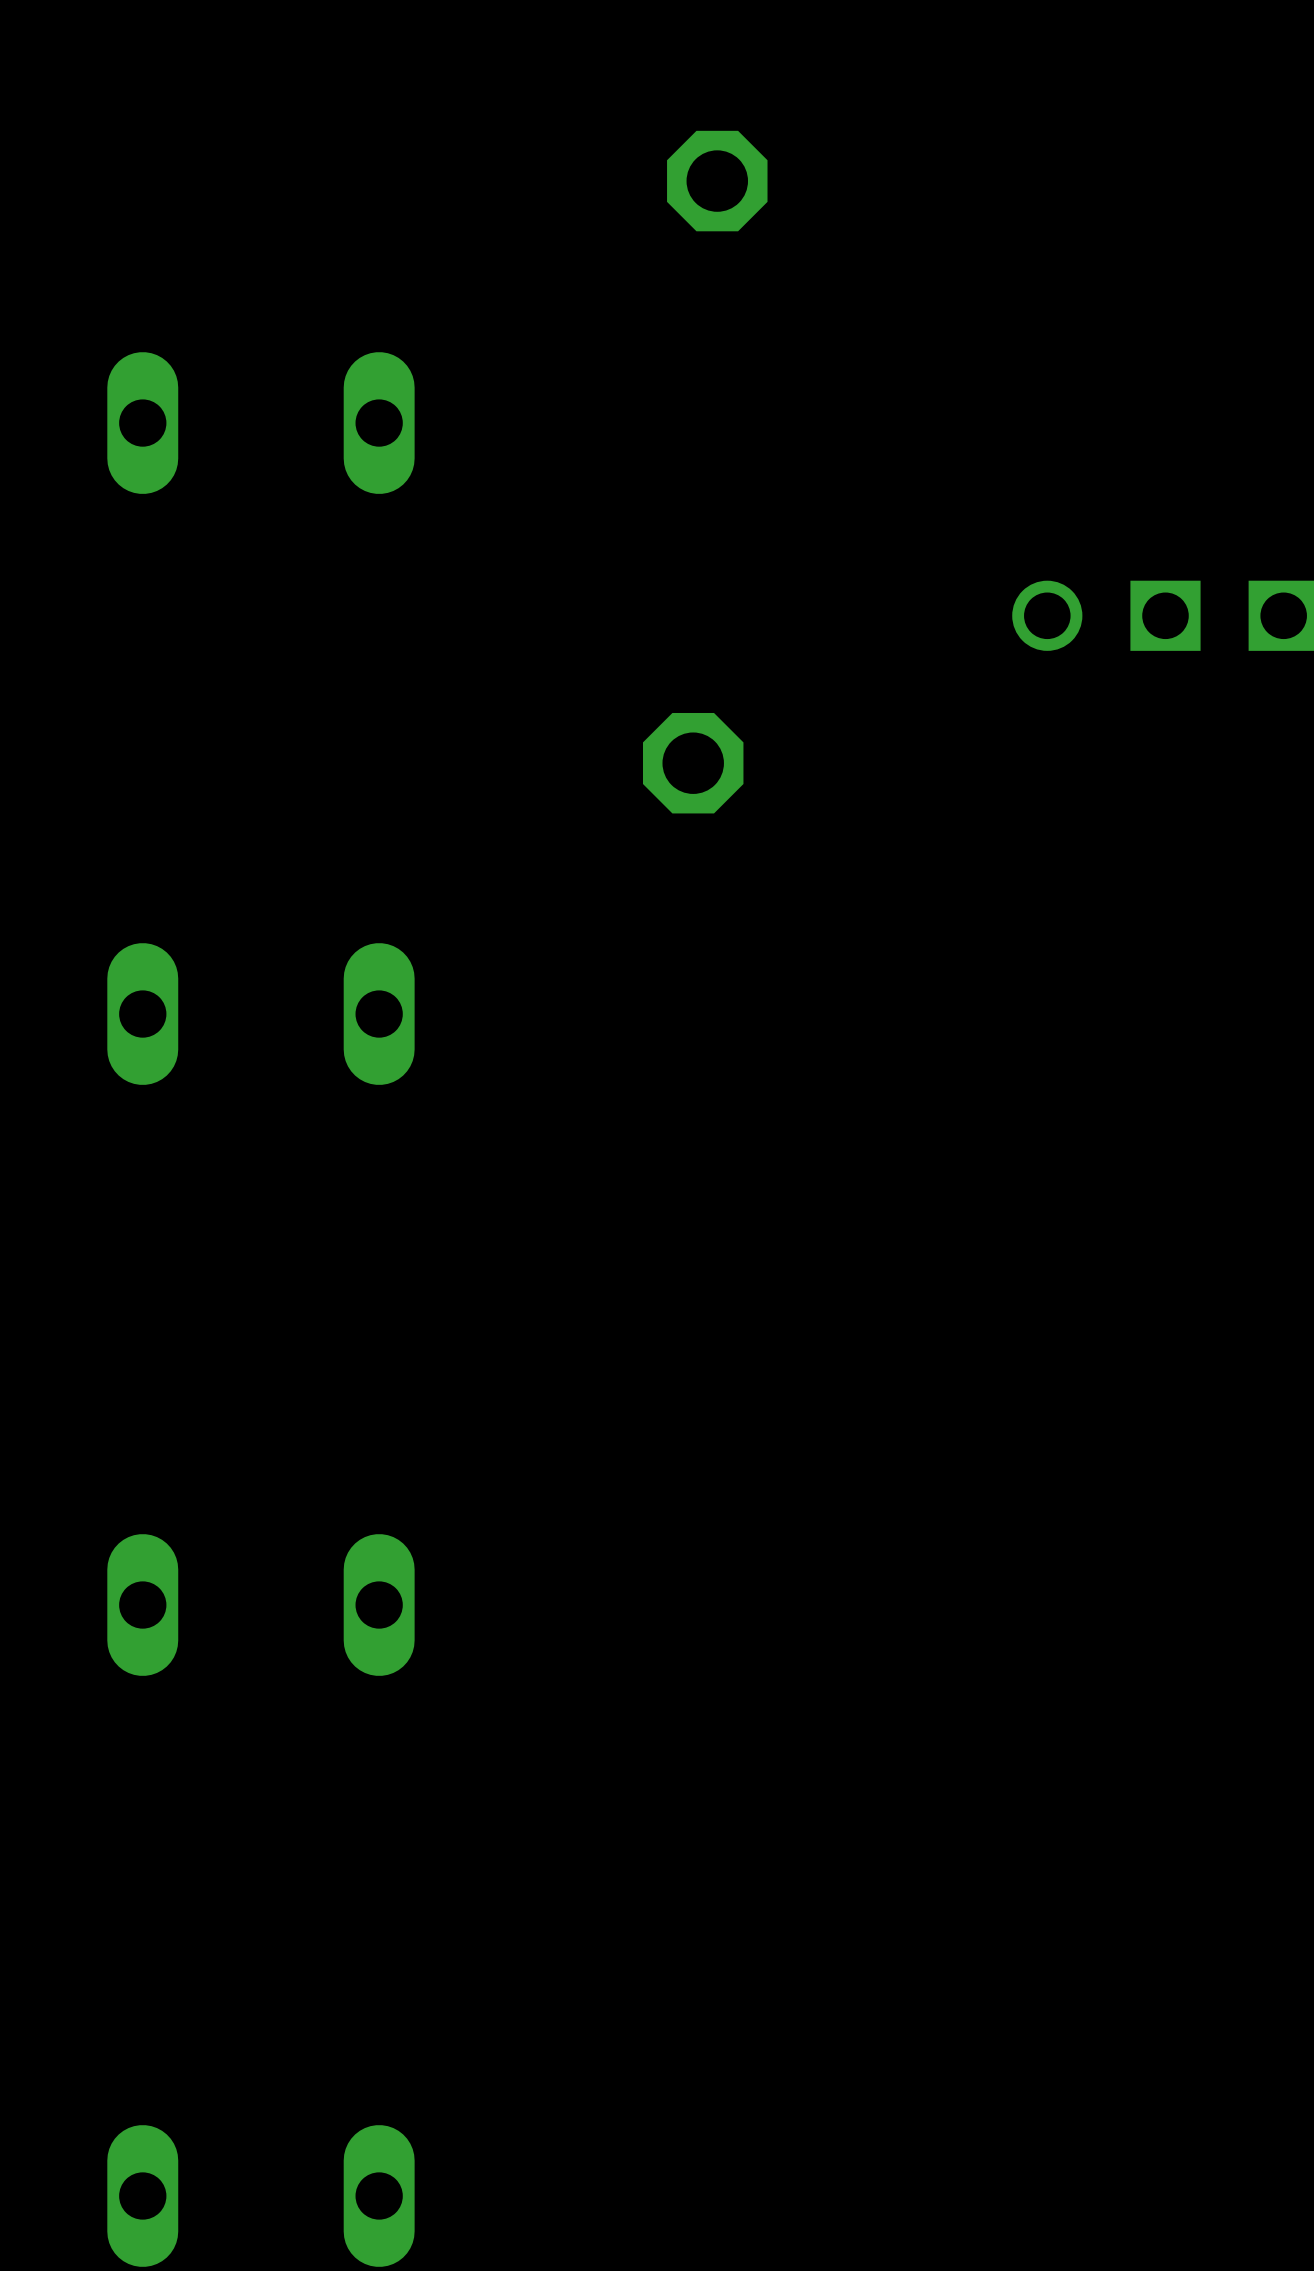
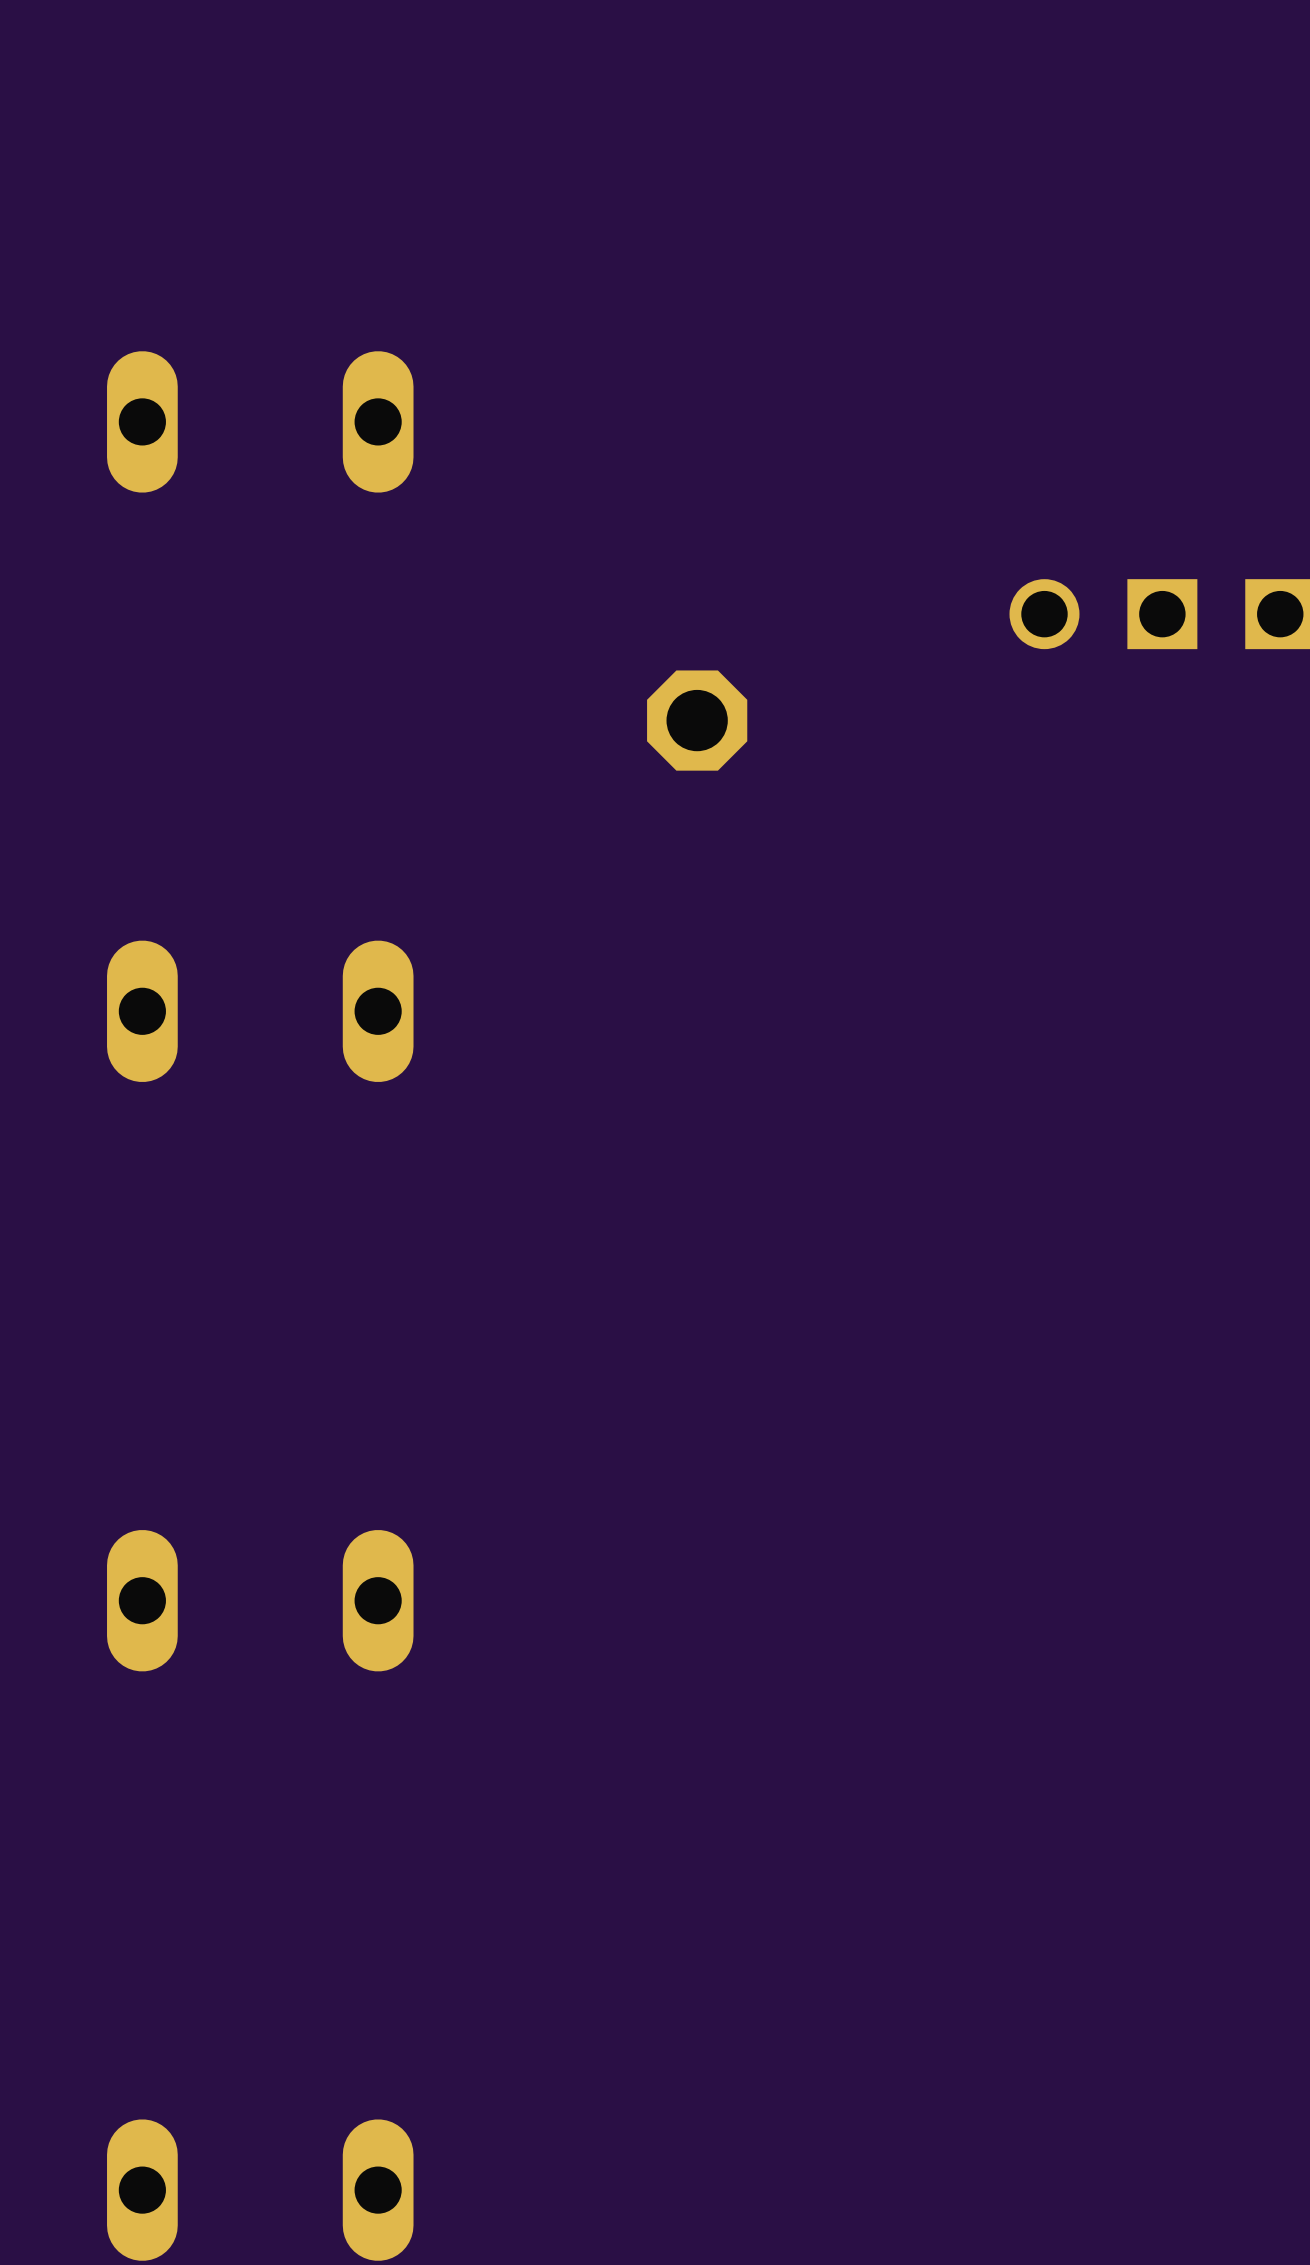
part: (717, 181) -> none
part position: (693, 763) -> (697, 720)

